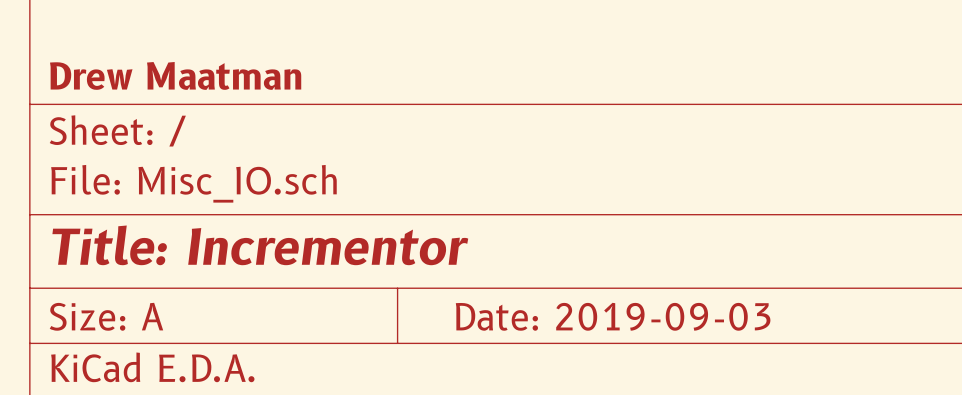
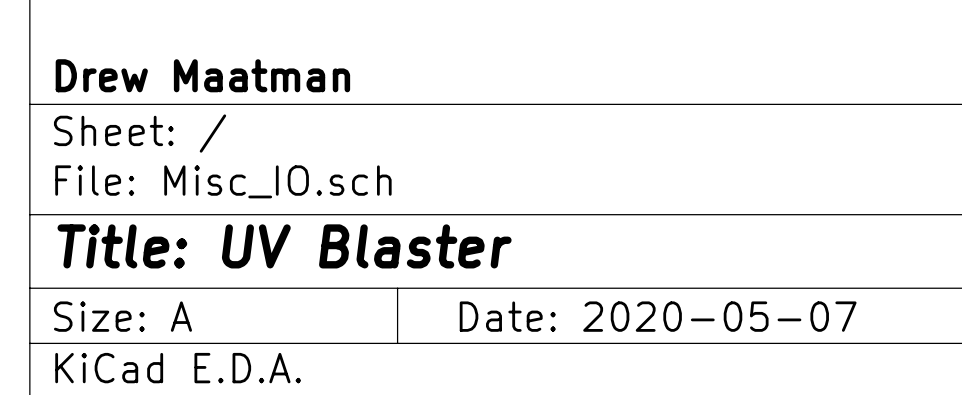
title block: Title: Incrementor (260, 245) -> Title: UV Blaster (284, 246)
title block: Date: 2019-09-03 (613, 316) -> Date: 2020-05-07 (658, 316)

